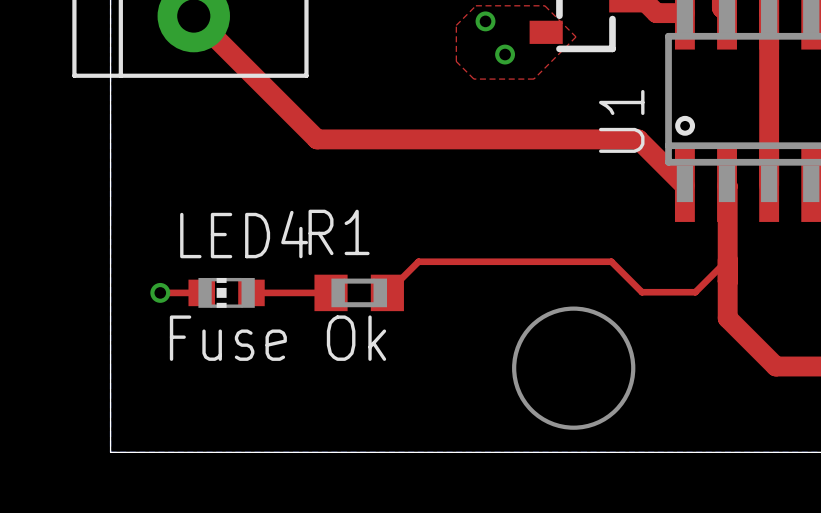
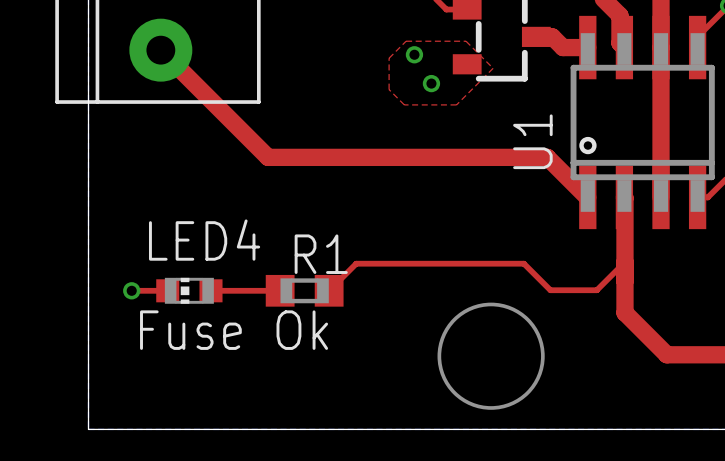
R1 name position: R1 (339, 232) -> R1 (321, 254)

